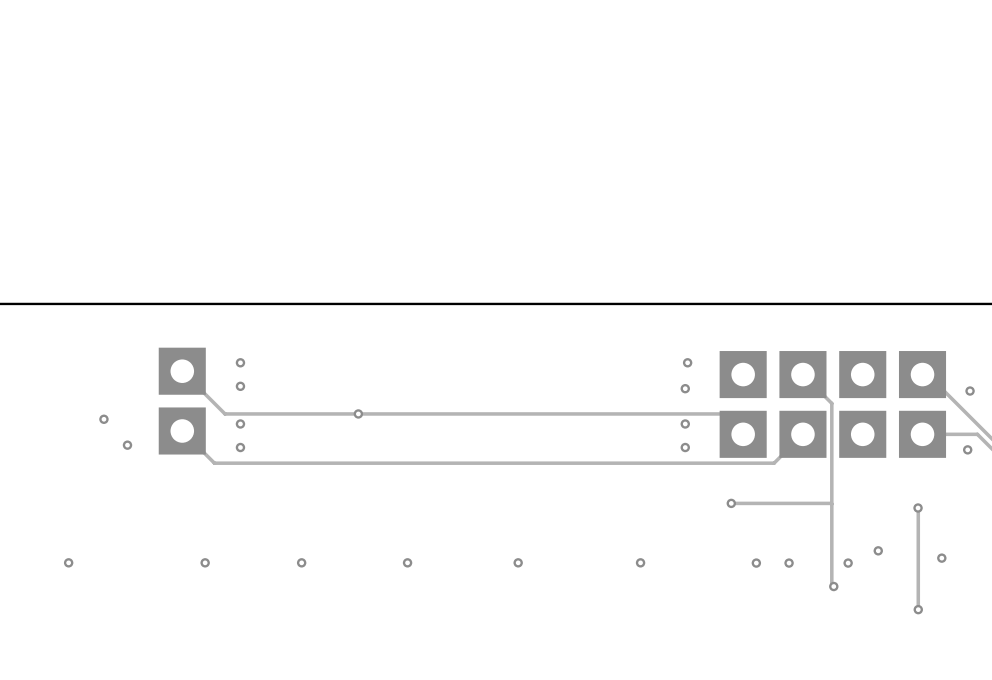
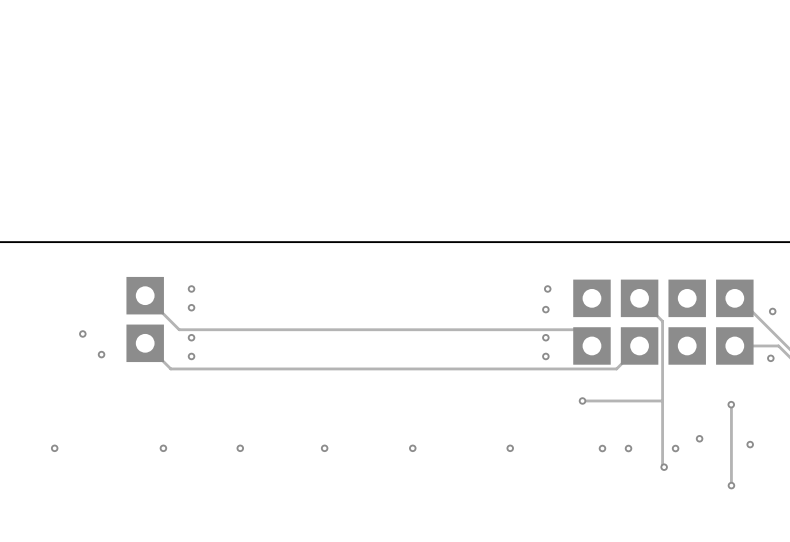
via: (358, 413) -> none

